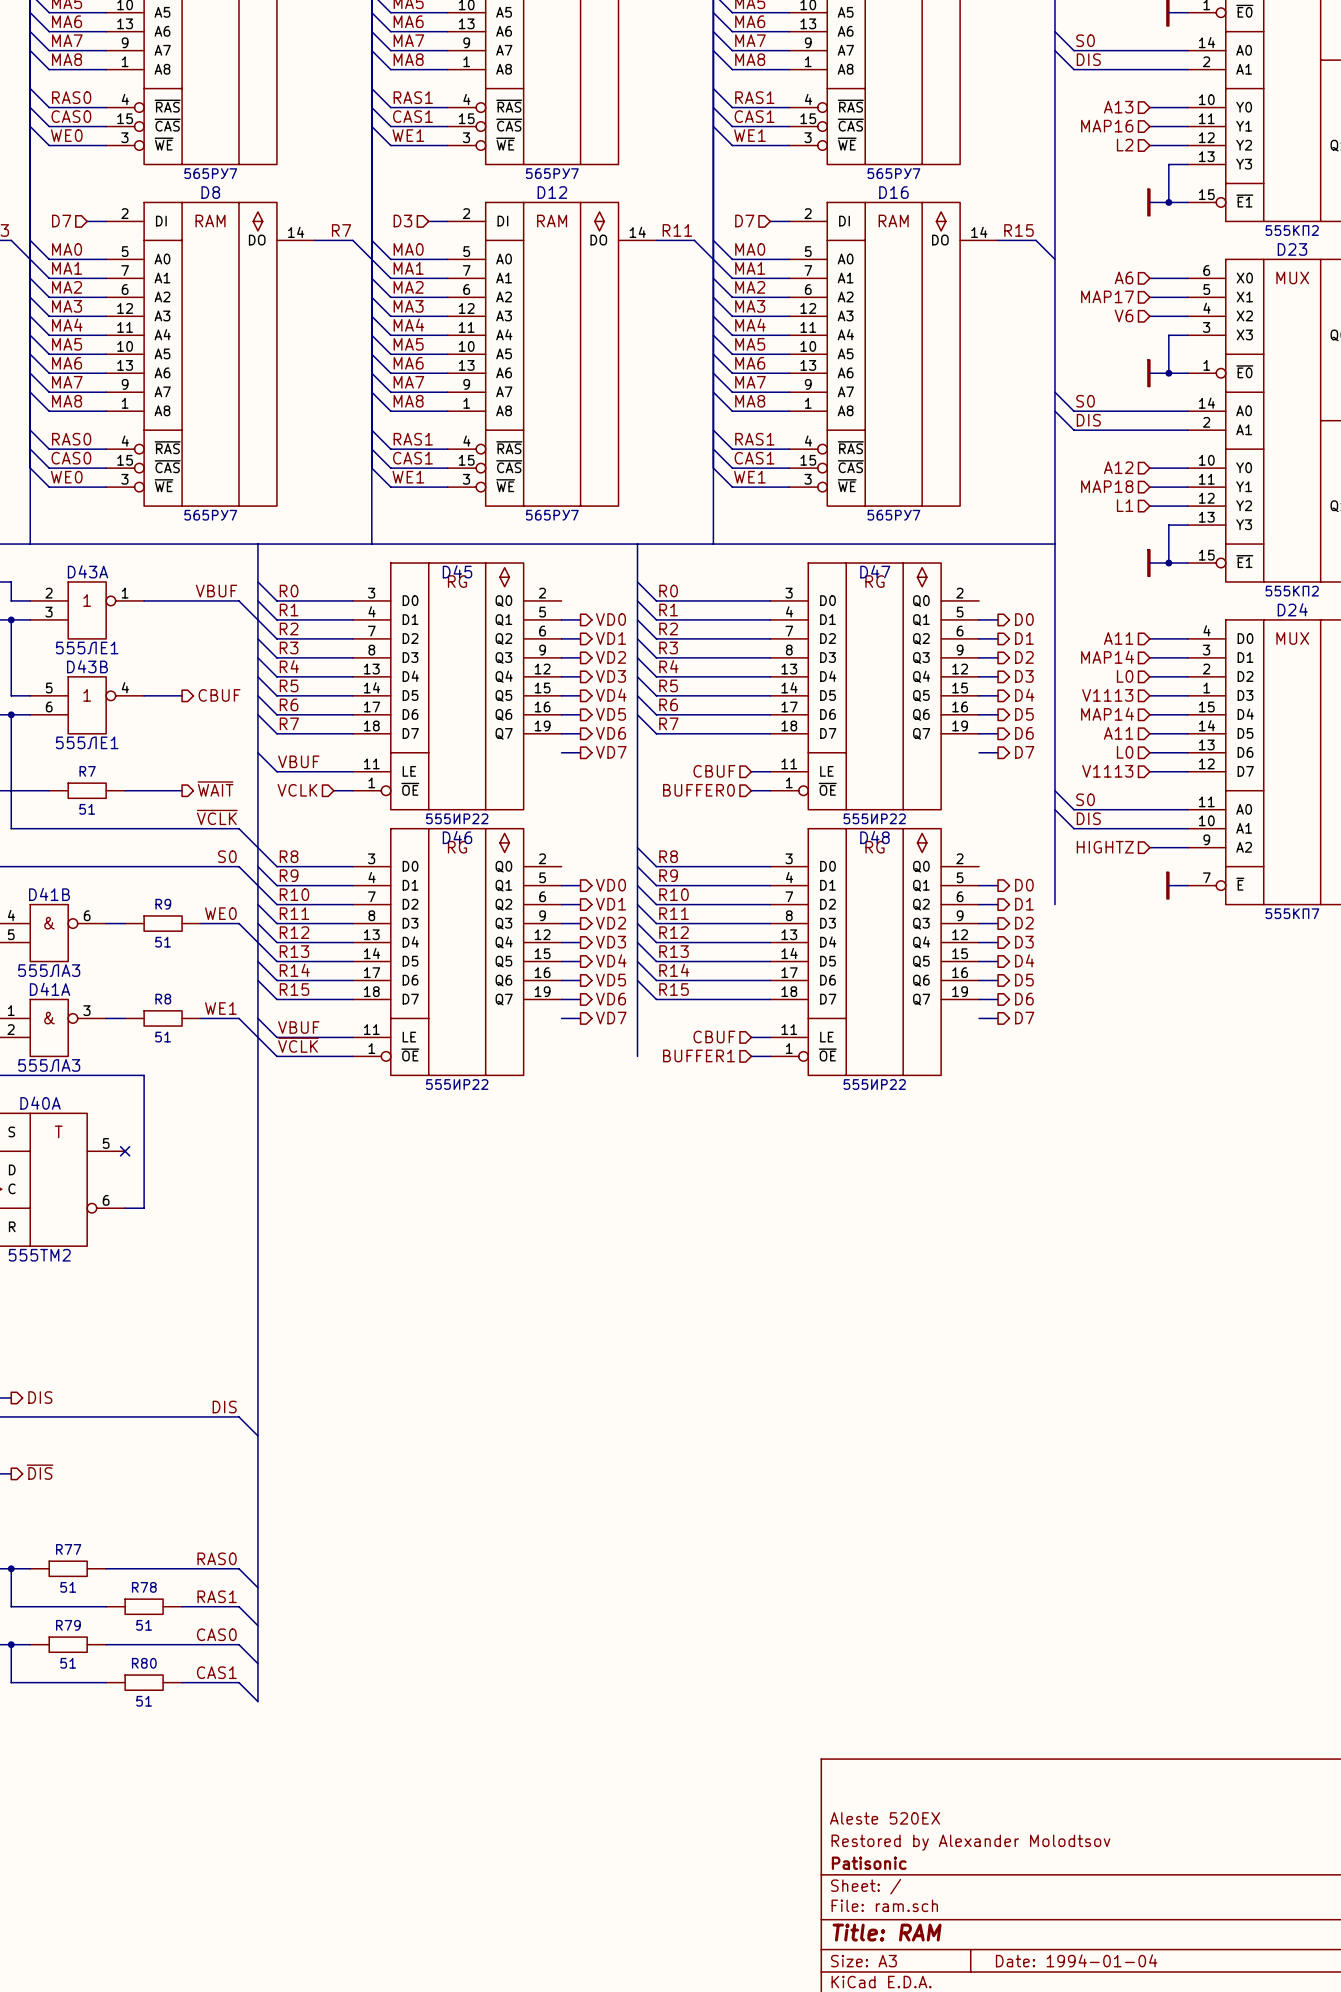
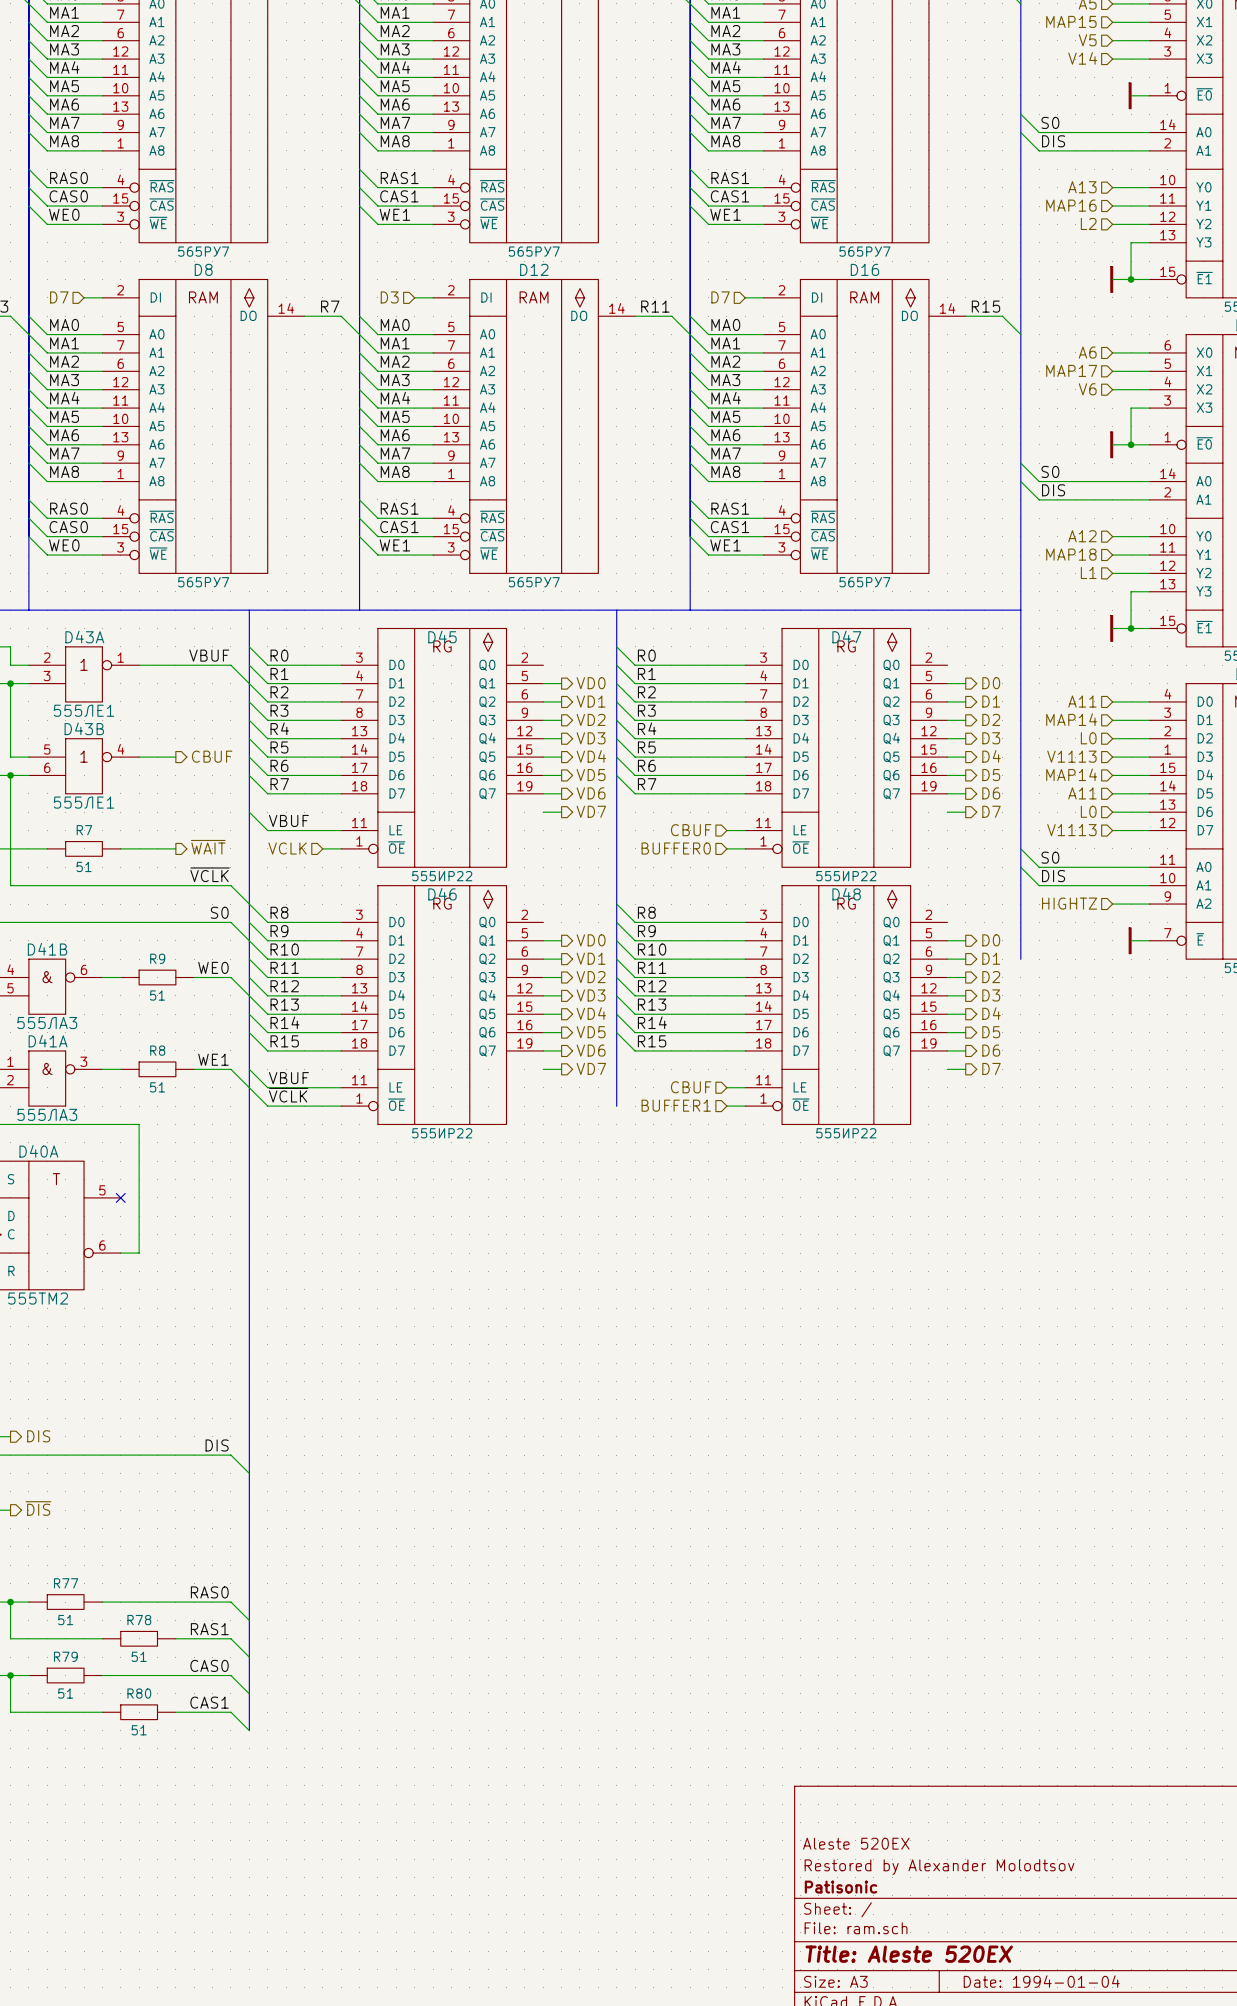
title block: Title: RAM (887, 1932) -> Title: Aleste 520EX (909, 1954)

